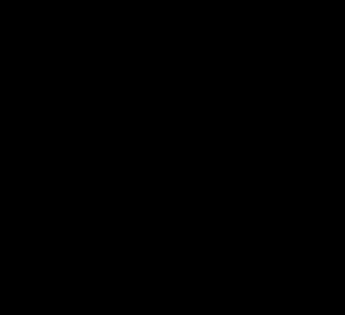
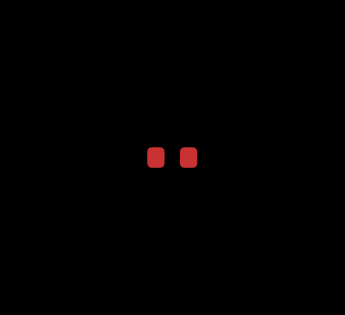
part: none -> (172, 157)

